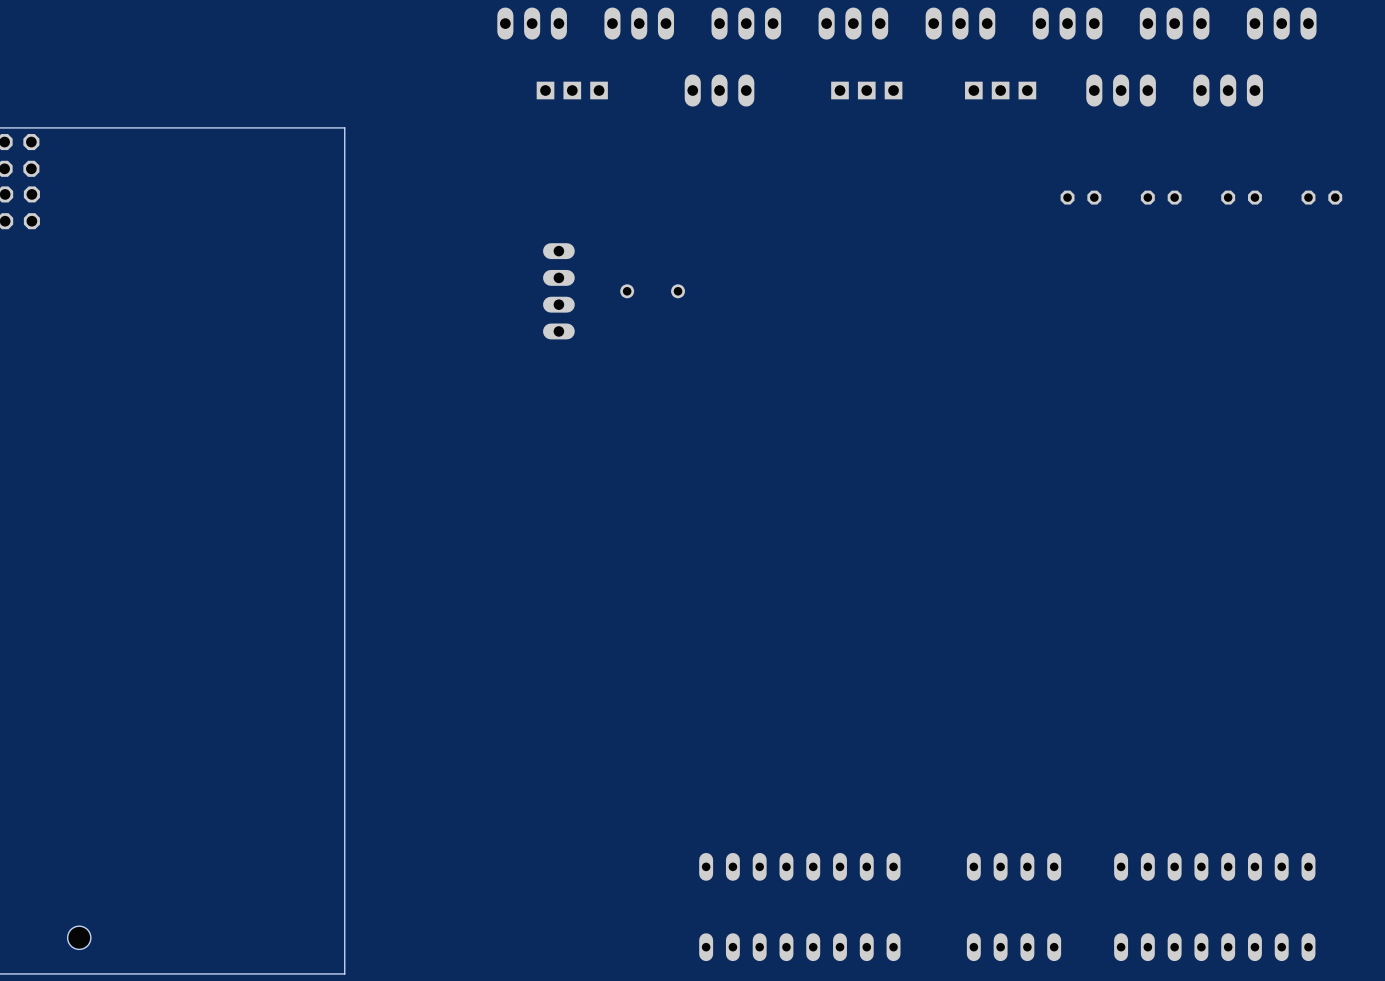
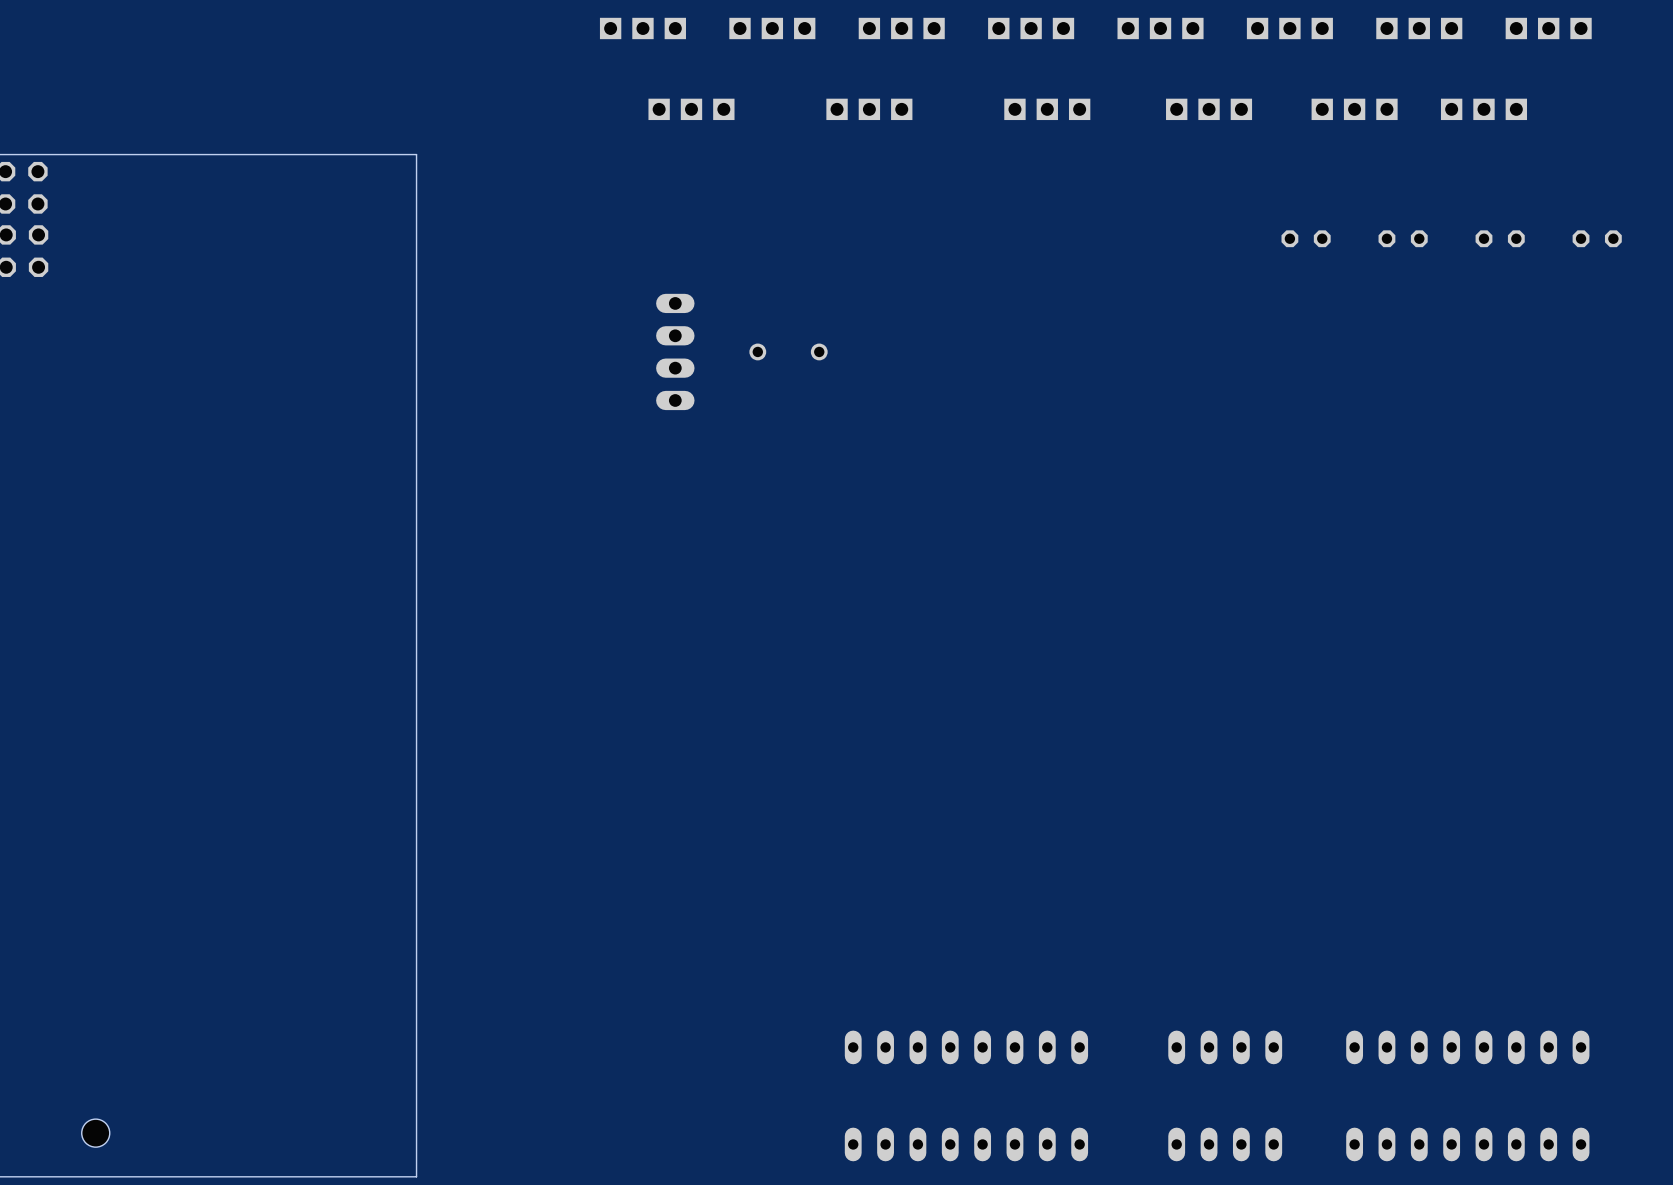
part footprint: [497, 7, 567, 40] -> [599, 17, 686, 40]
part footprint: [604, 7, 675, 40] -> [729, 17, 816, 40]
part footprint: [711, 7, 782, 40] -> [858, 17, 945, 40]
part footprint: [818, 7, 889, 40] -> [988, 17, 1075, 40]
part footprint: [925, 7, 996, 40] -> [1117, 17, 1204, 40]
part footprint: [1032, 7, 1103, 40] -> [1246, 17, 1333, 40]
part footprint: [1139, 7, 1210, 40] -> [1376, 17, 1463, 40]
part footprint: [1246, 7, 1317, 40] -> [1505, 17, 1592, 40]
part footprint: [684, 74, 755, 107] -> [826, 98, 913, 121]
part footprint: [1086, 74, 1156, 107] -> [1311, 98, 1398, 121]
part footprint: [1193, 74, 1263, 107] -> [1440, 98, 1528, 121]

